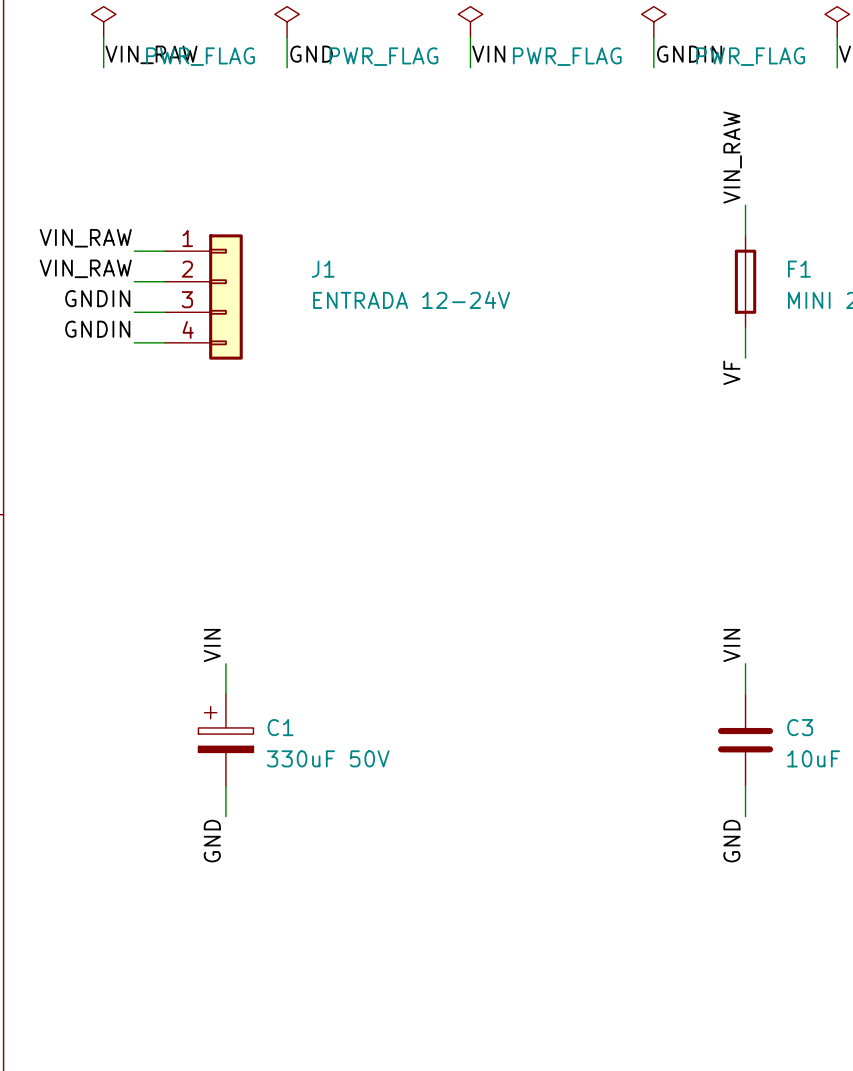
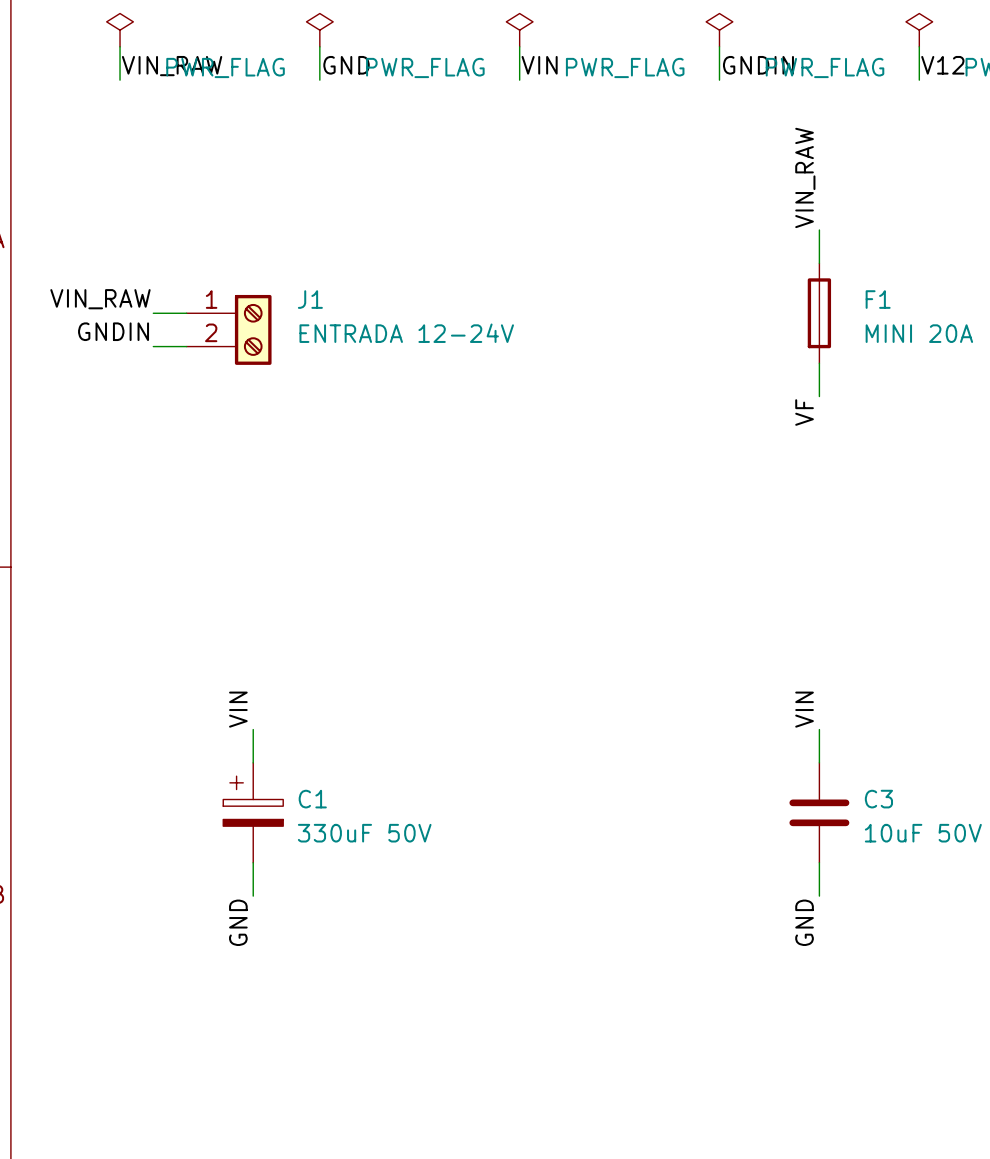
J1 symbol: [164, 234, 243, 360] -> [186, 294, 272, 365]
label: VIN_RAW (85, 238) -> none
wire: (134, 251) (164, 251) -> none
J1 name position: J1 (323, 269) -> J1 (310, 299)
J1 value position: ENTRADA 12-24V (411, 300) -> ENTRADA 12-24V (406, 333)
label: GNDIN (97, 329) -> none
wire: (134, 342) (164, 342) -> none

